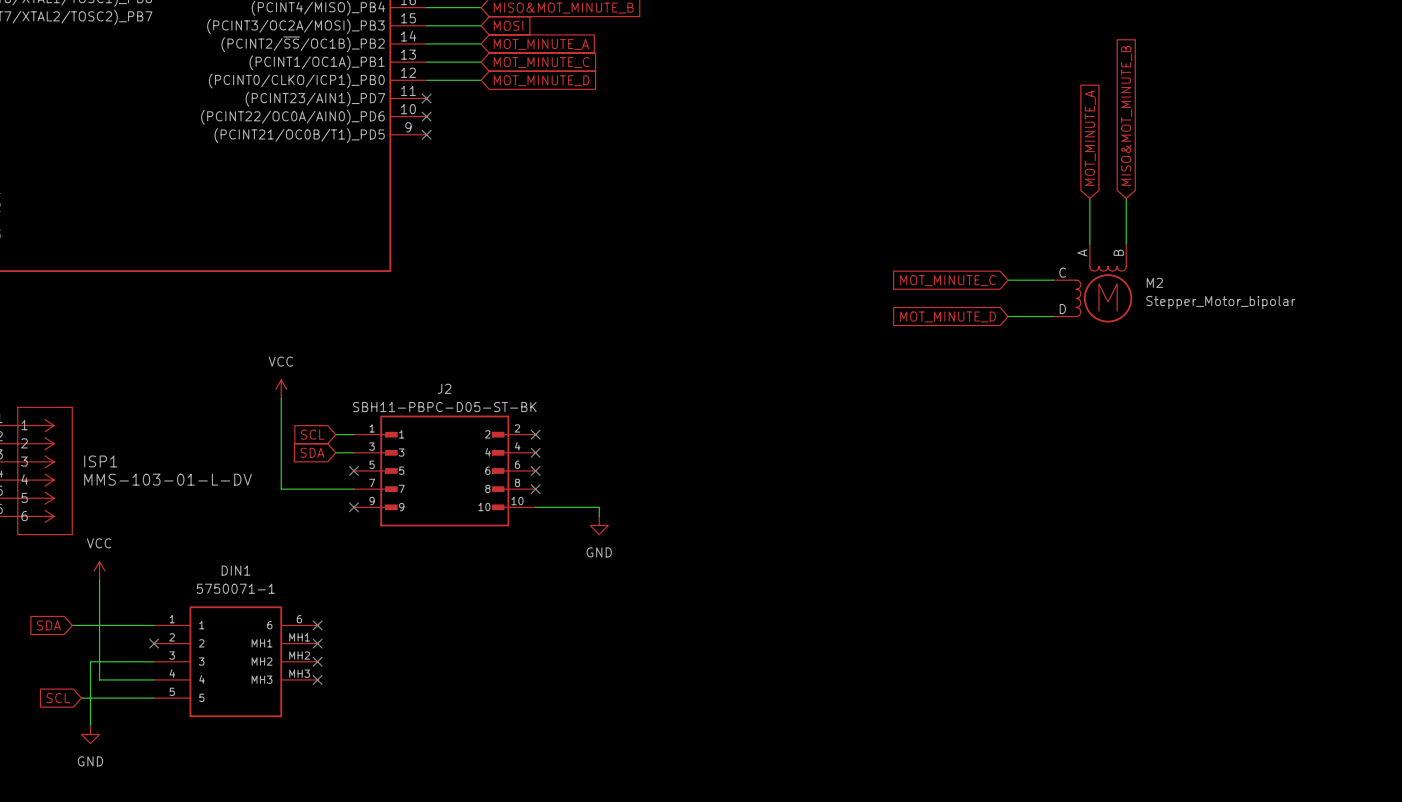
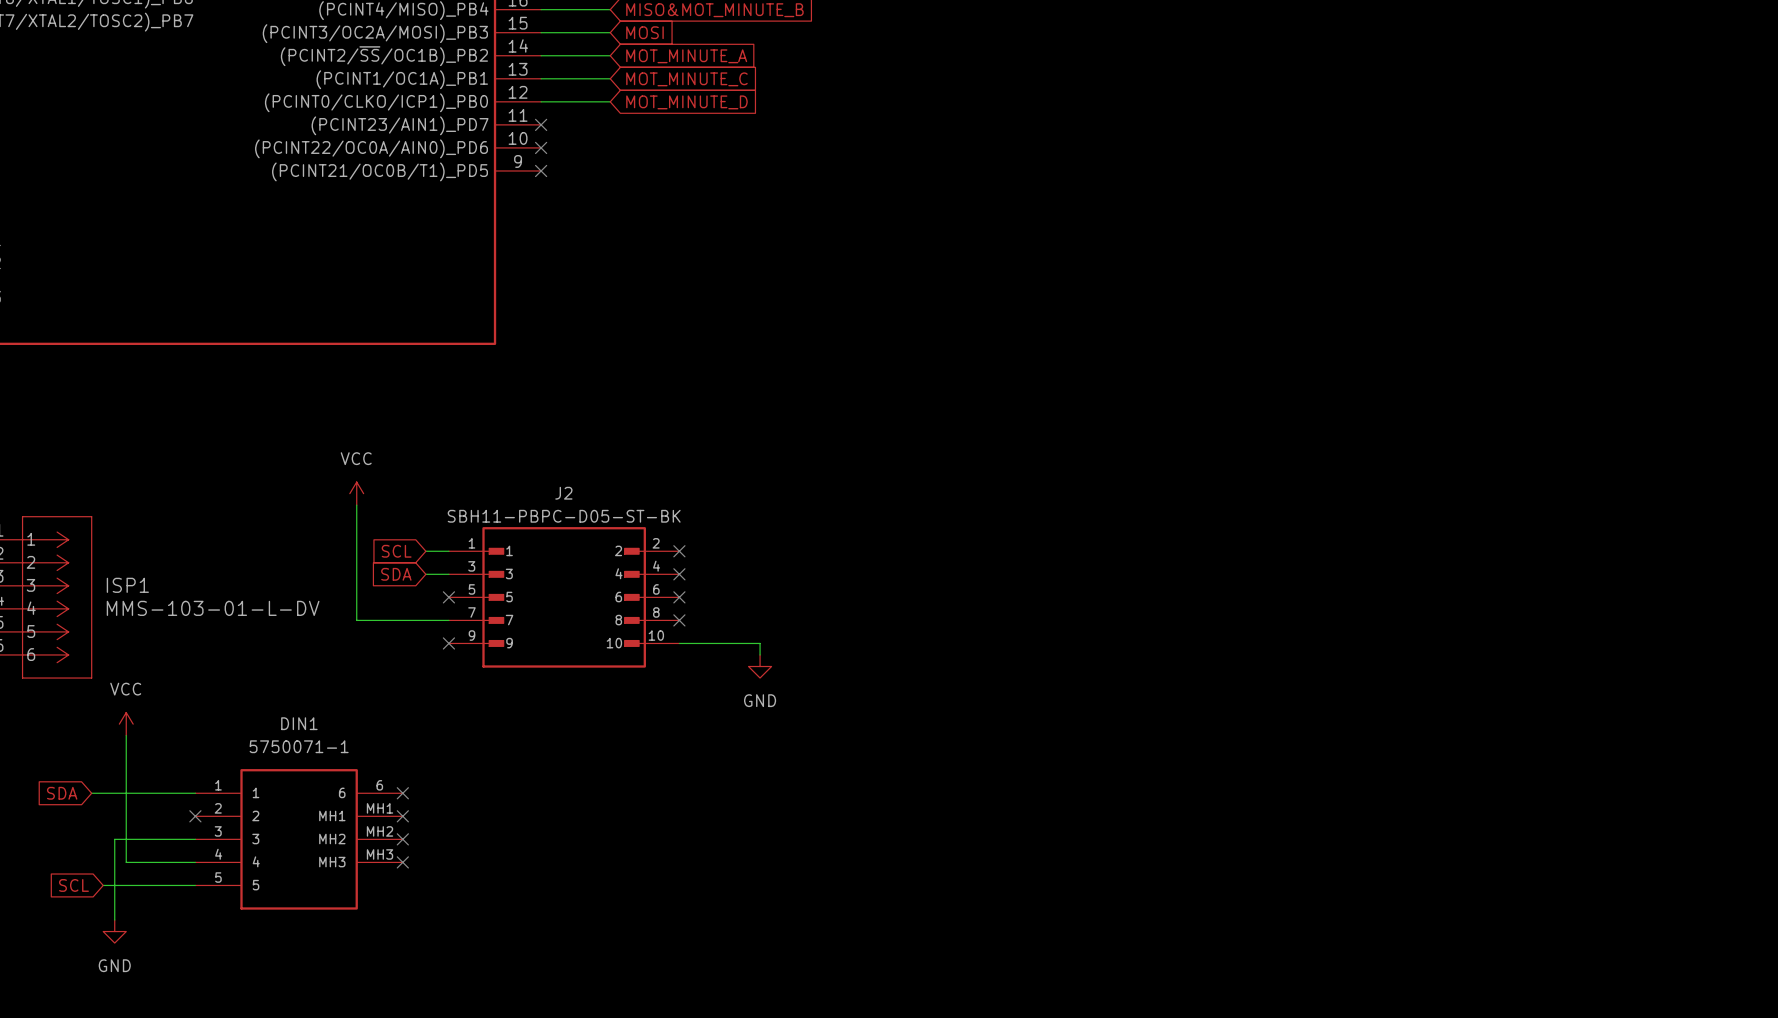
global label: MISO&MOT_MINUTE_B (1126, 115) -> none
global label: MOT_MINUTE_A (1090, 138) -> none
wire: (1089, 198) (1089, 243) -> none
wire: (1126, 198) (1126, 243) -> none
global label: MOT_MINUTE_C (948, 280) -> none
wire: (1008, 280) (1053, 280) -> none
M2: Stepper_Motor_bipolar (1092, 283) -> none
global label: MOT_MINUTE_D (948, 316) -> none
wire: (1008, 316) (1053, 316) -> none

